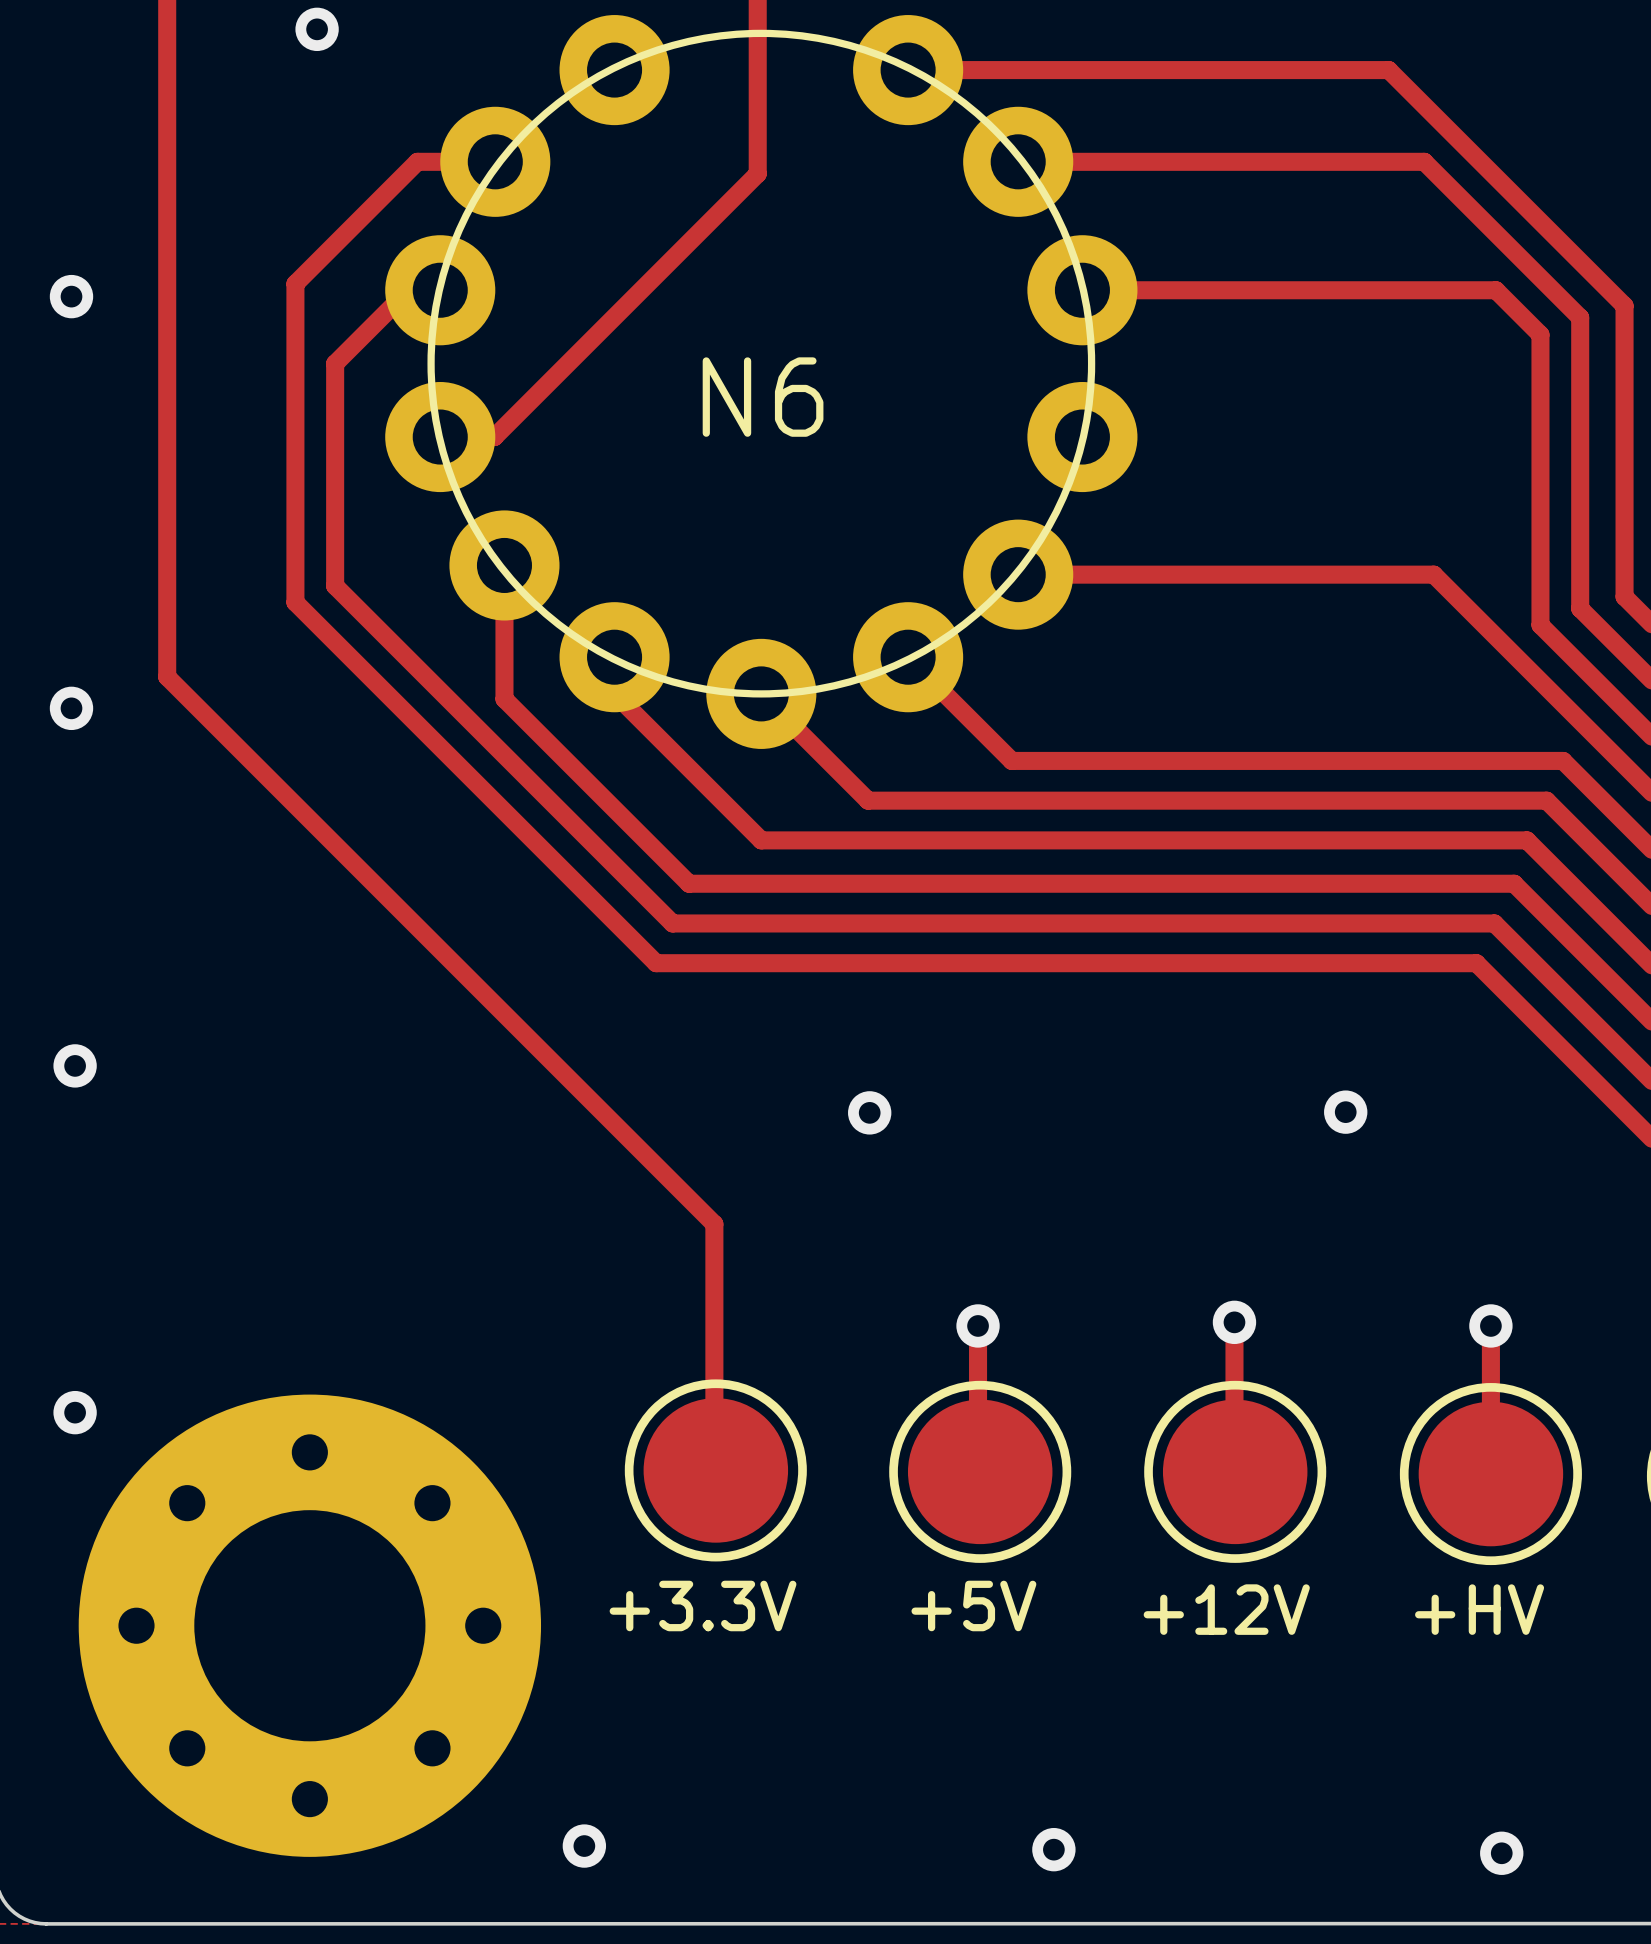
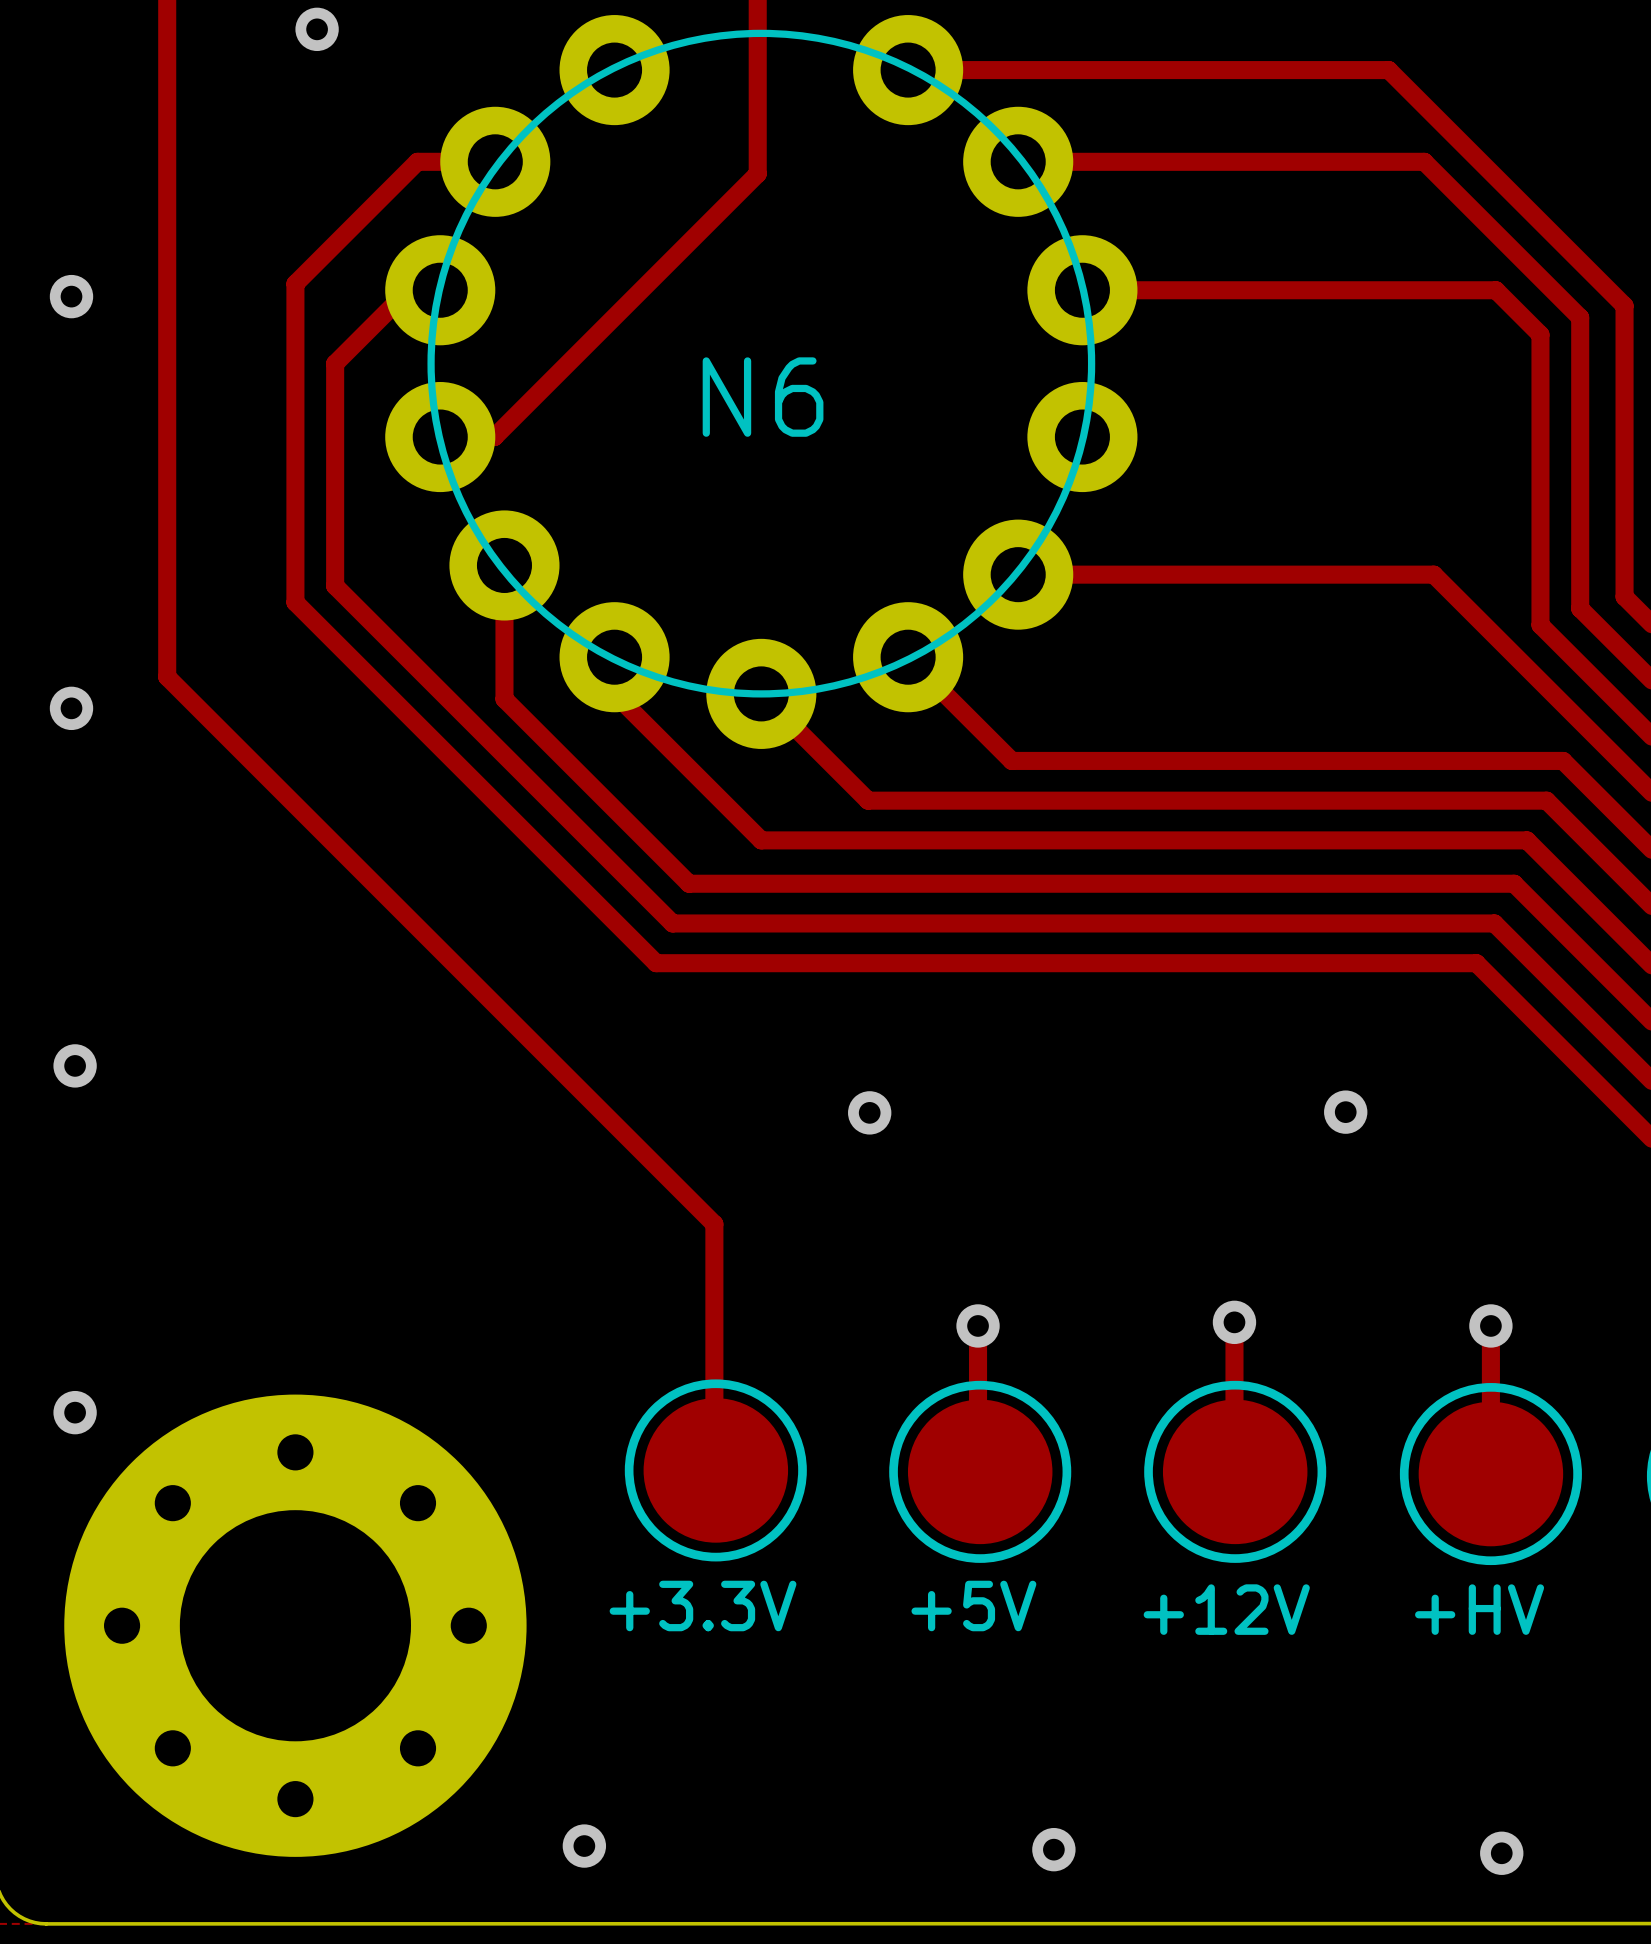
part position: (309, 1625) -> (295, 1625)

